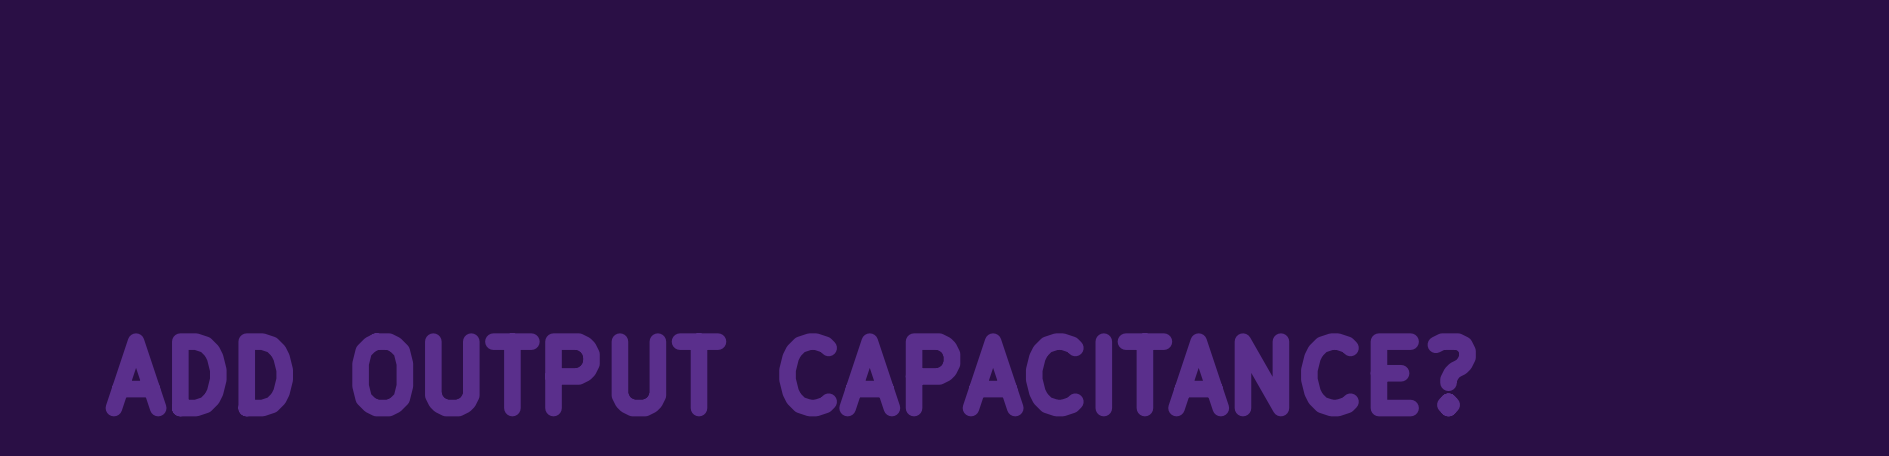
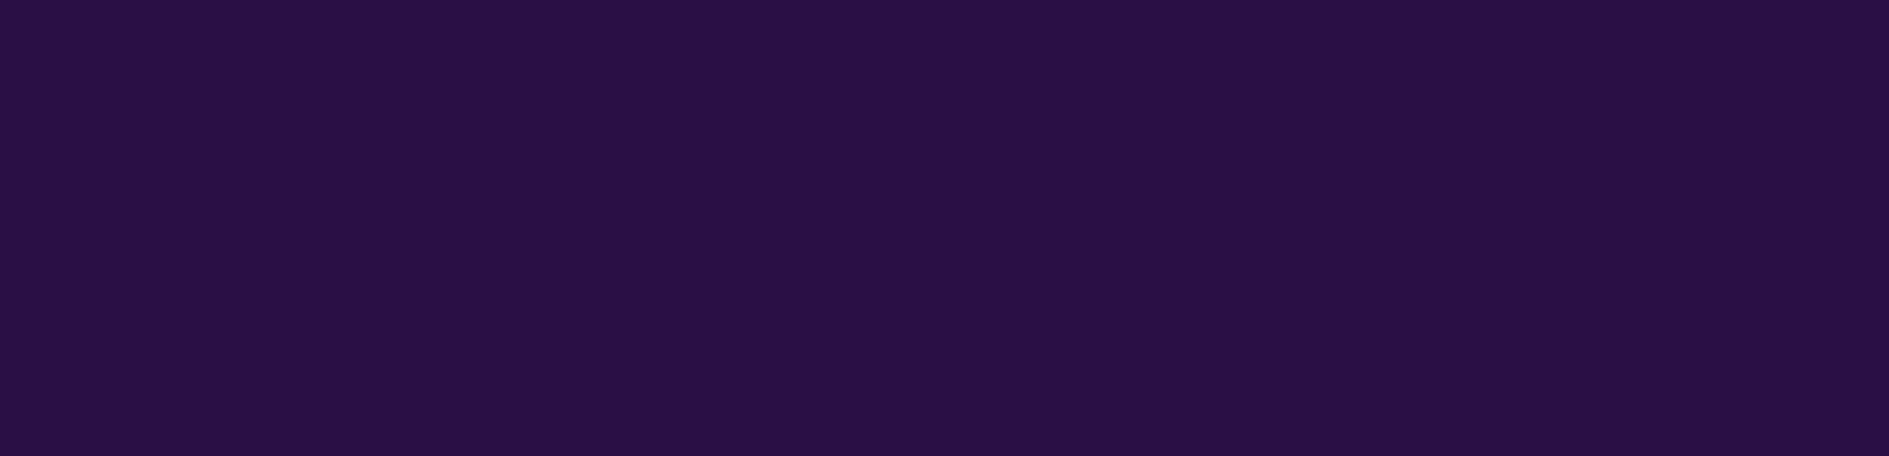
text: ADD OUTPUT CAPACITANCE? (790, 374) -> none

